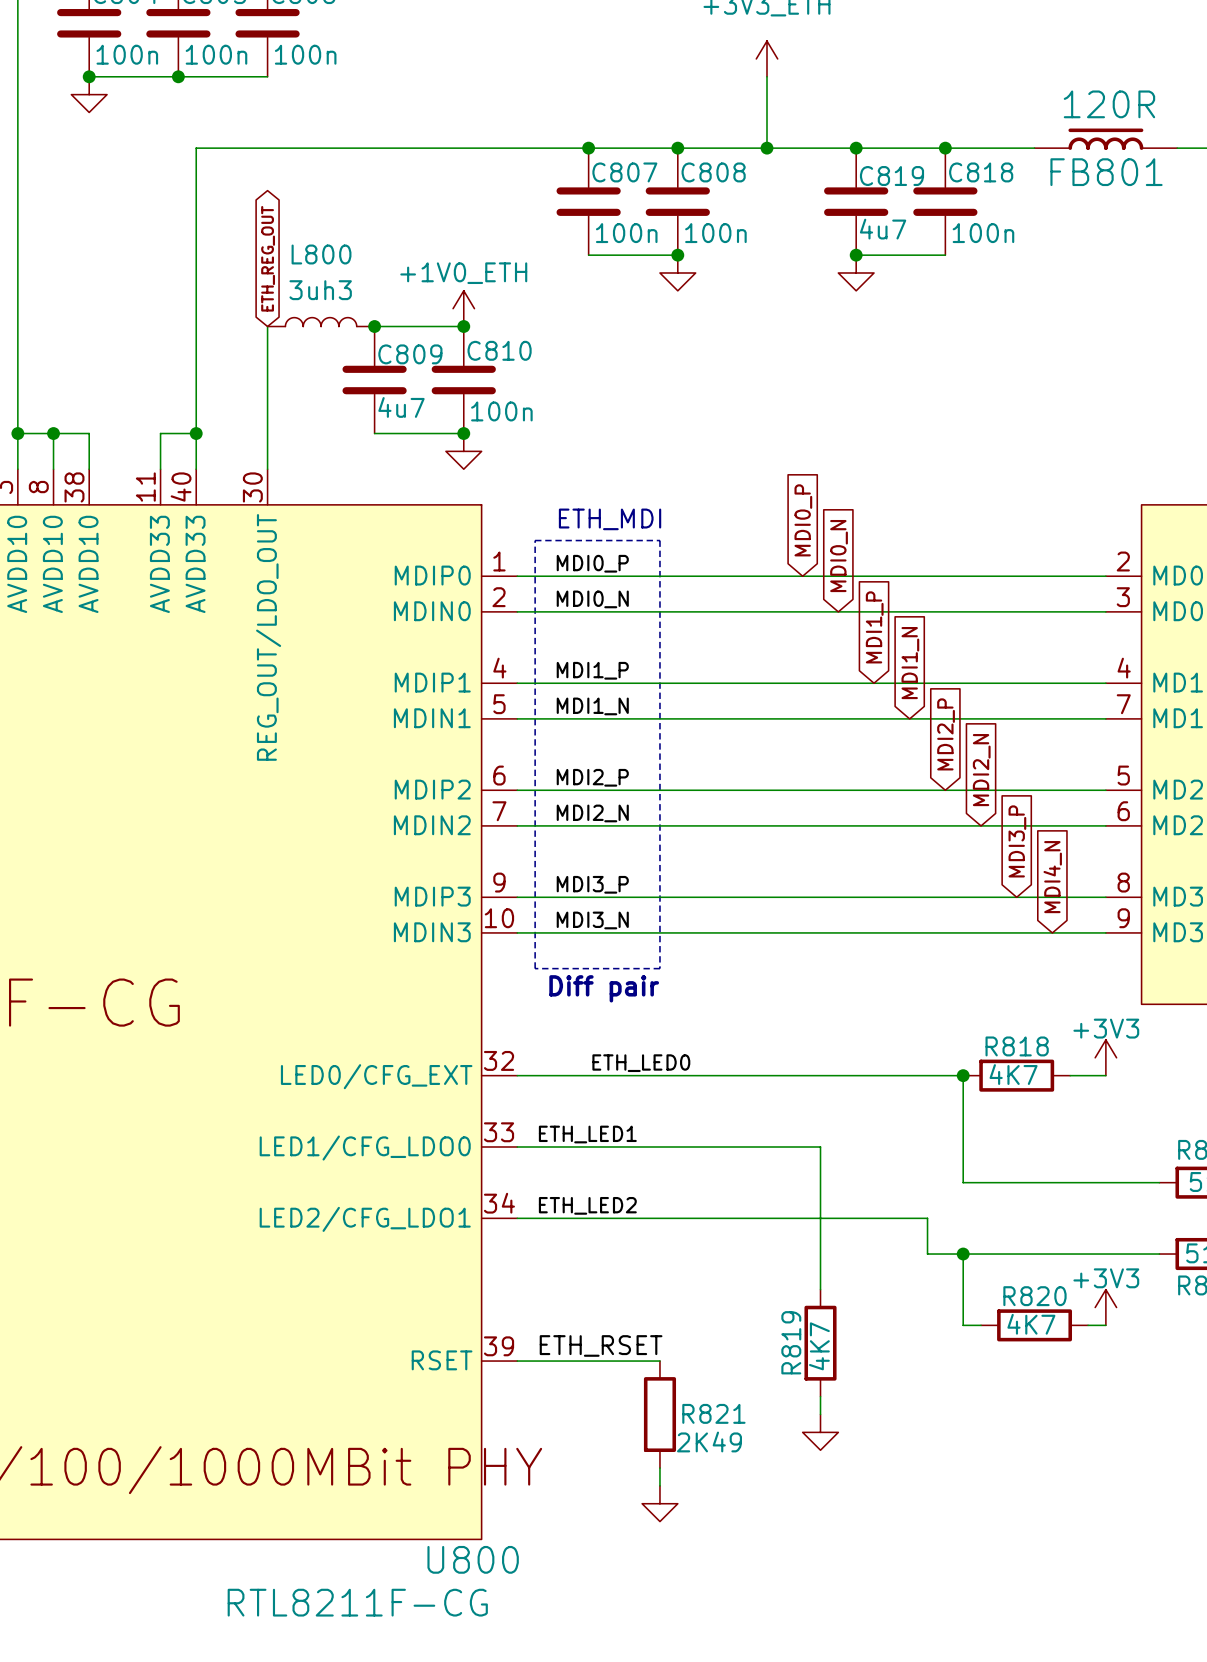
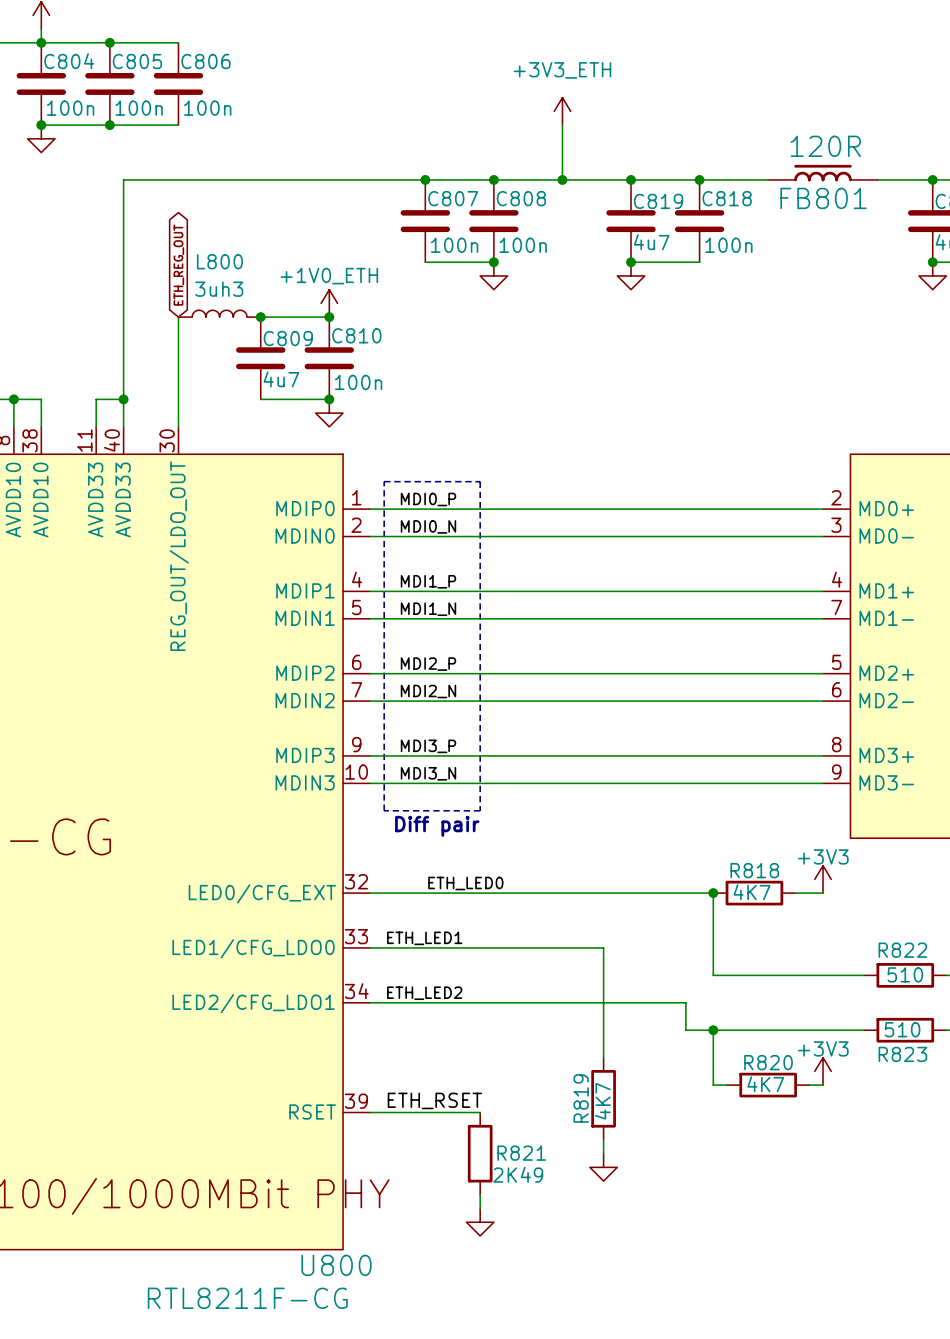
text: ETH_MDI (610, 519) -> none
global label: MDI0_P (803, 520) -> none
global label: MDI0_N (839, 556) -> none
global label: MDI1_P (874, 627) -> none
global label: MDI1_N (910, 663) -> none
global label: MDI2_P (946, 734) -> none
global label: MDI2_N (981, 770) -> none
global label: MDI3_P (1017, 841) -> none
global label: MDI4_N (1052, 877) -> none

